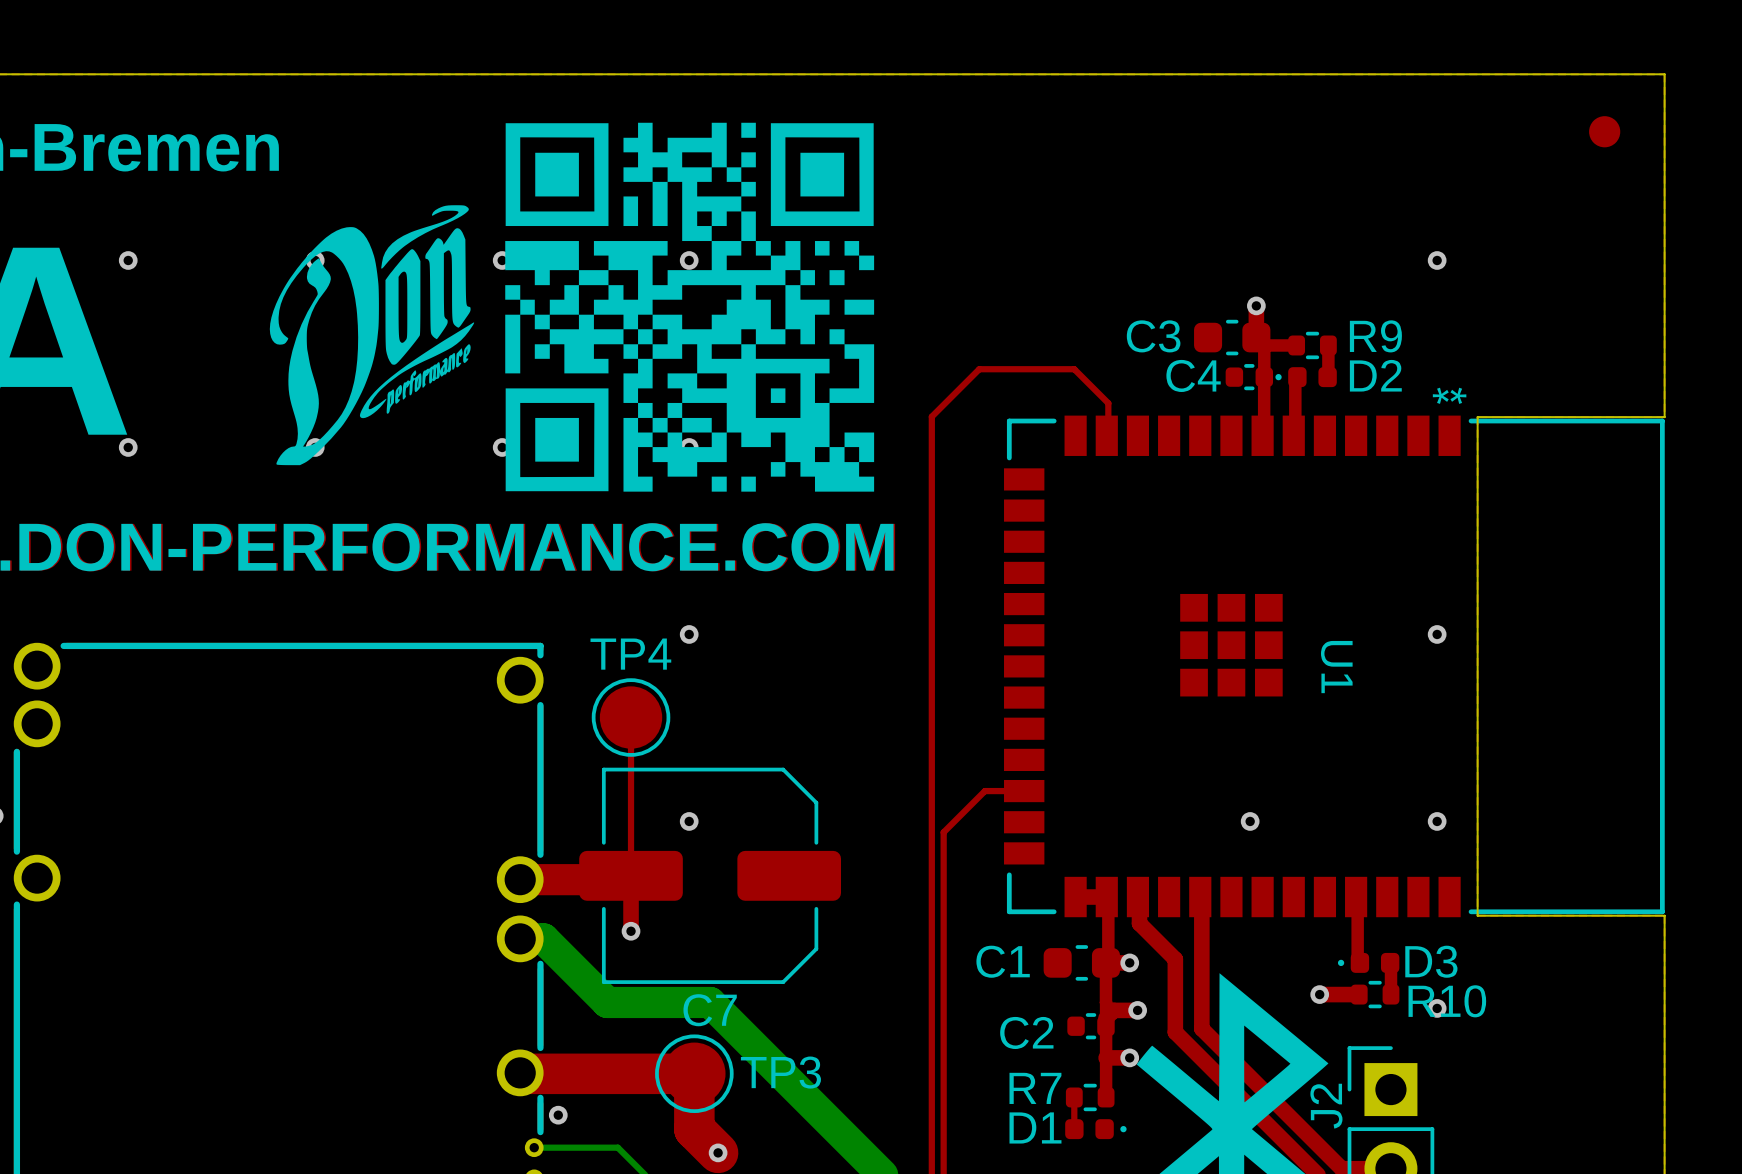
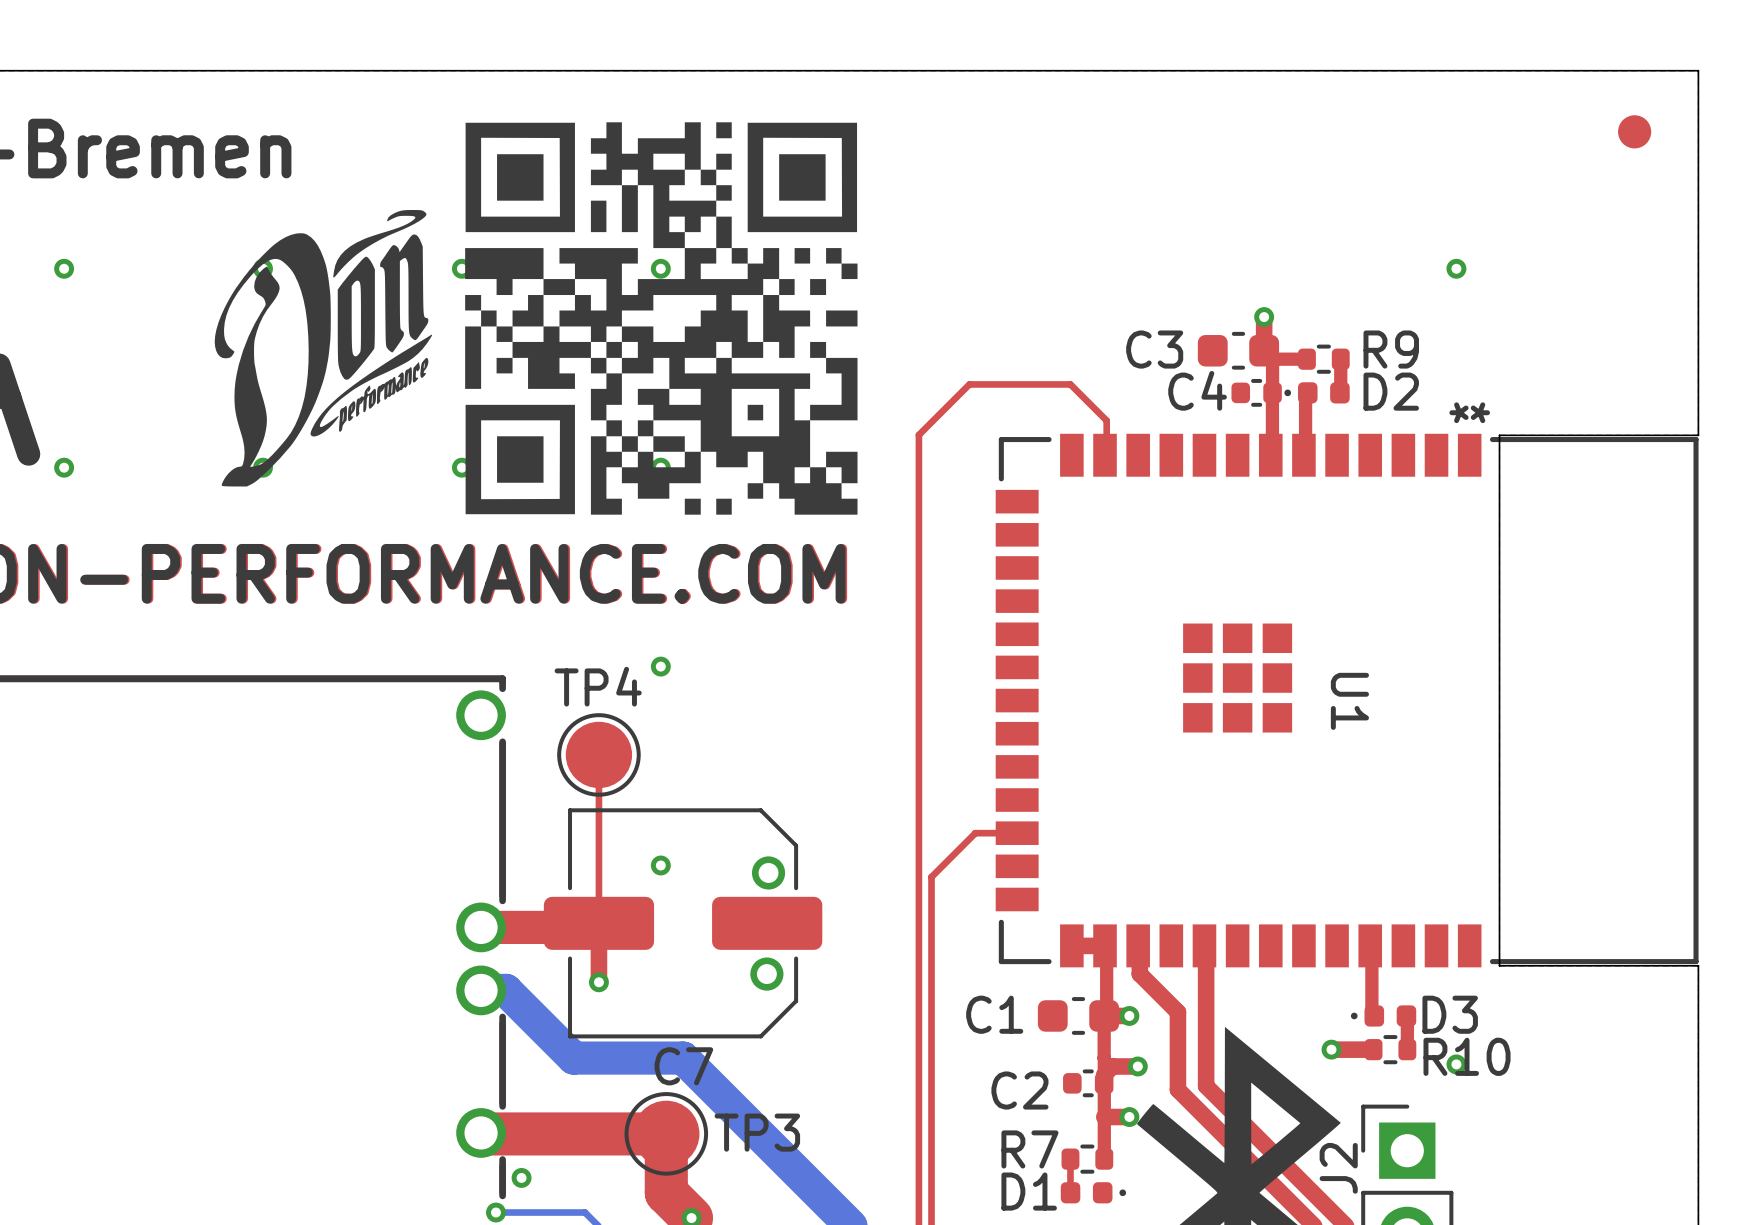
via: (1437, 634) -> none
via: (1250, 821) -> none
via: (1437, 821) -> none
via: none -> (768, 872)
via: none -> (766, 974)

